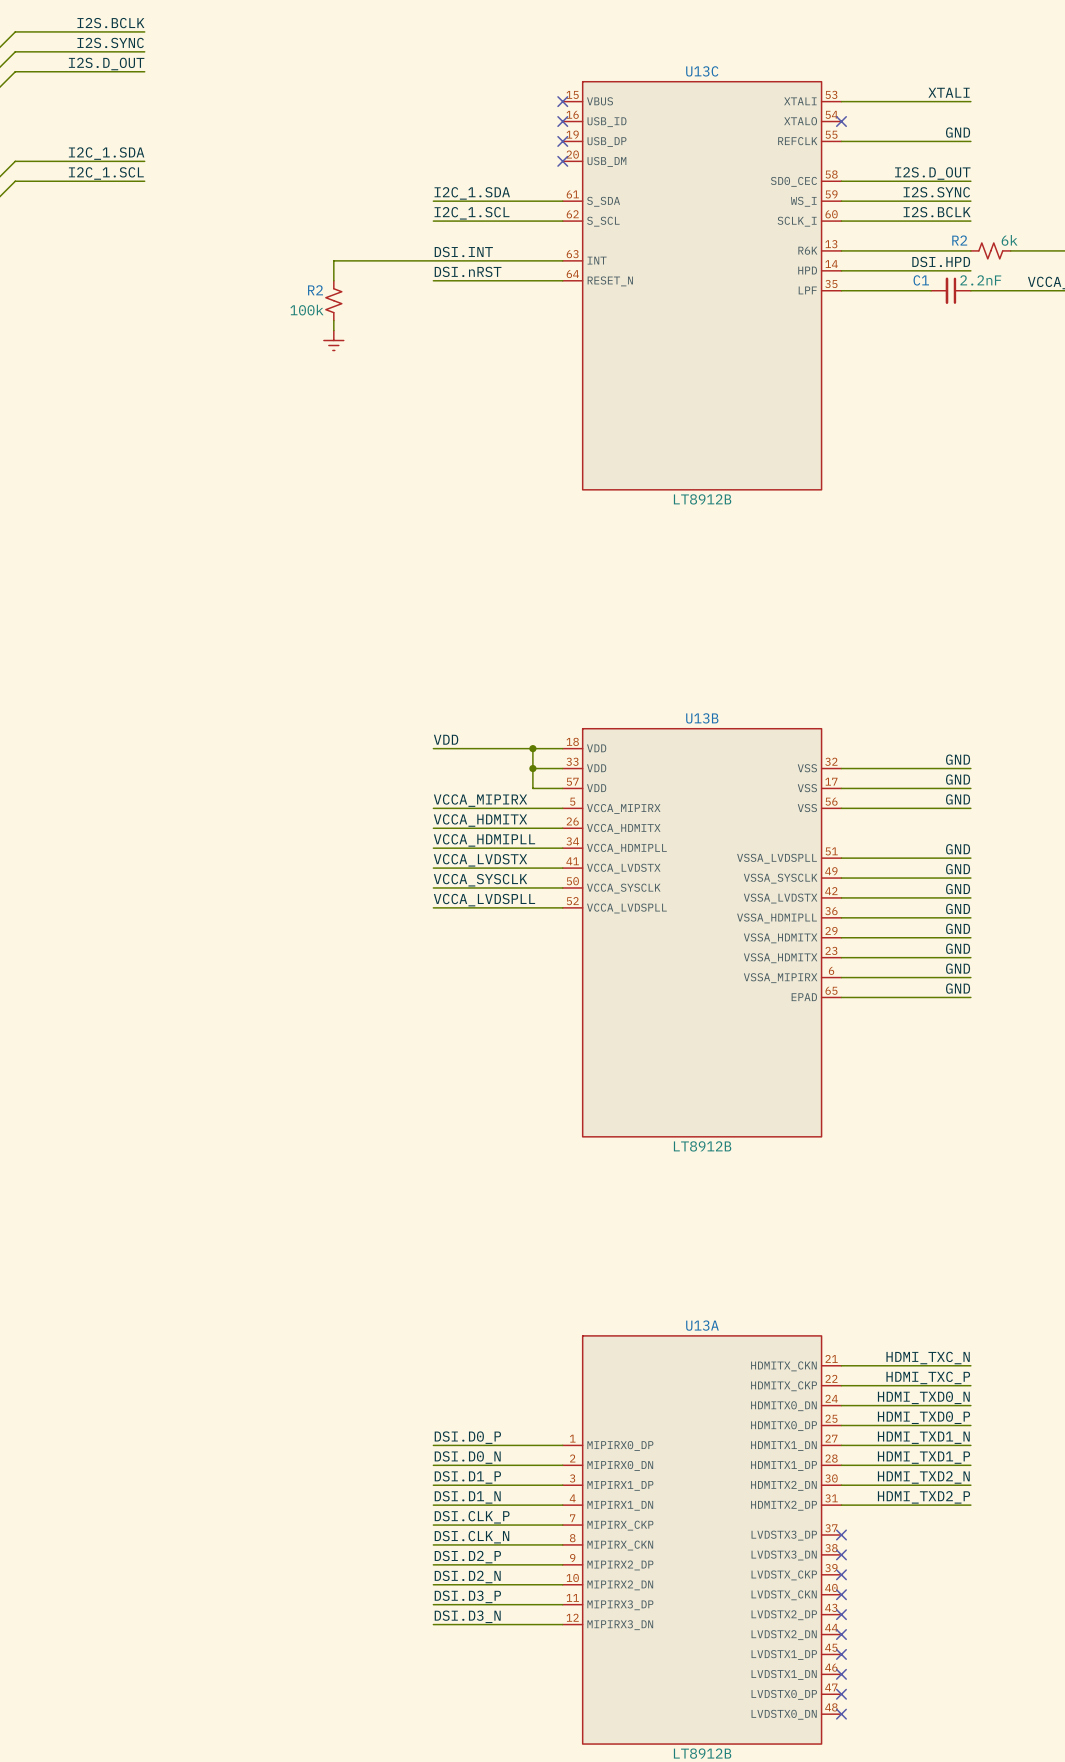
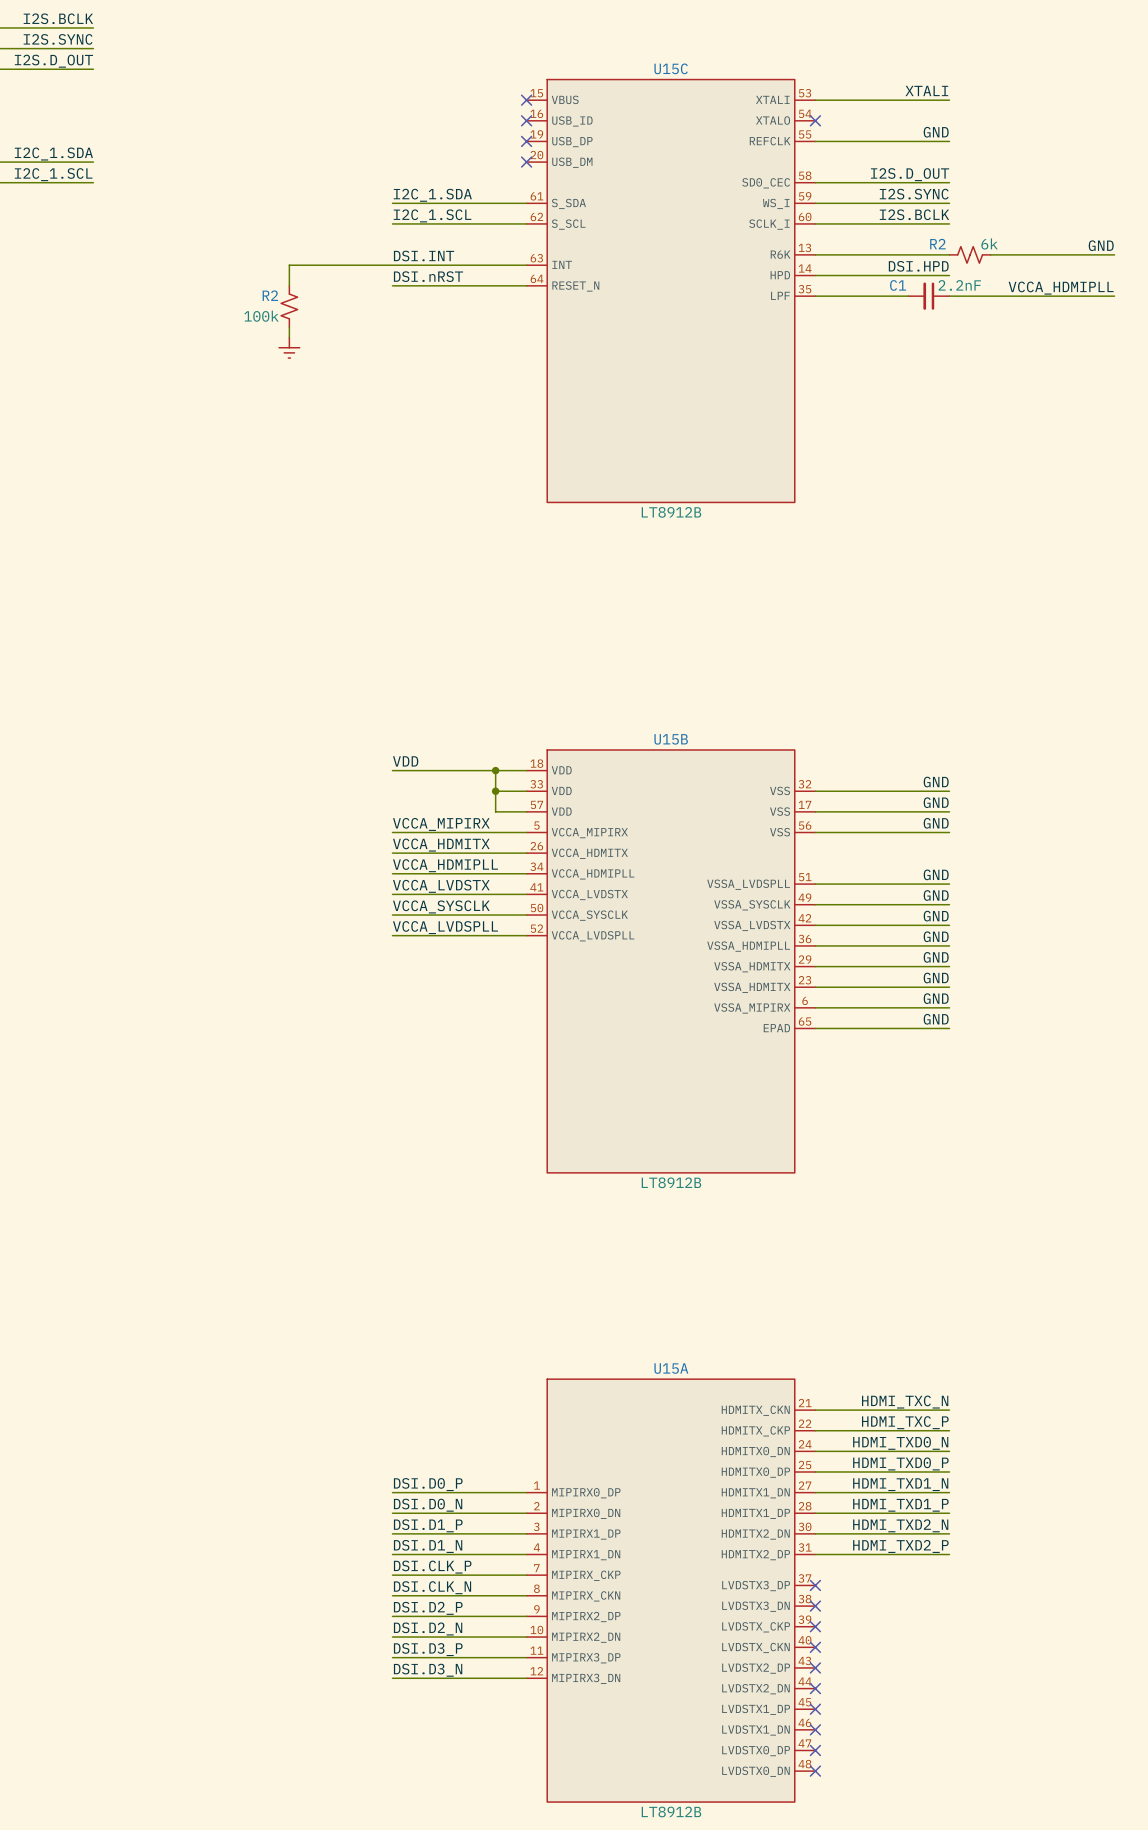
U13C name: U13C (702, 71) -> U15C (671, 68)
U13B name: U13B (702, 718) -> U15B (671, 739)
U13A name: U13A (702, 1325) -> U15A (671, 1368)

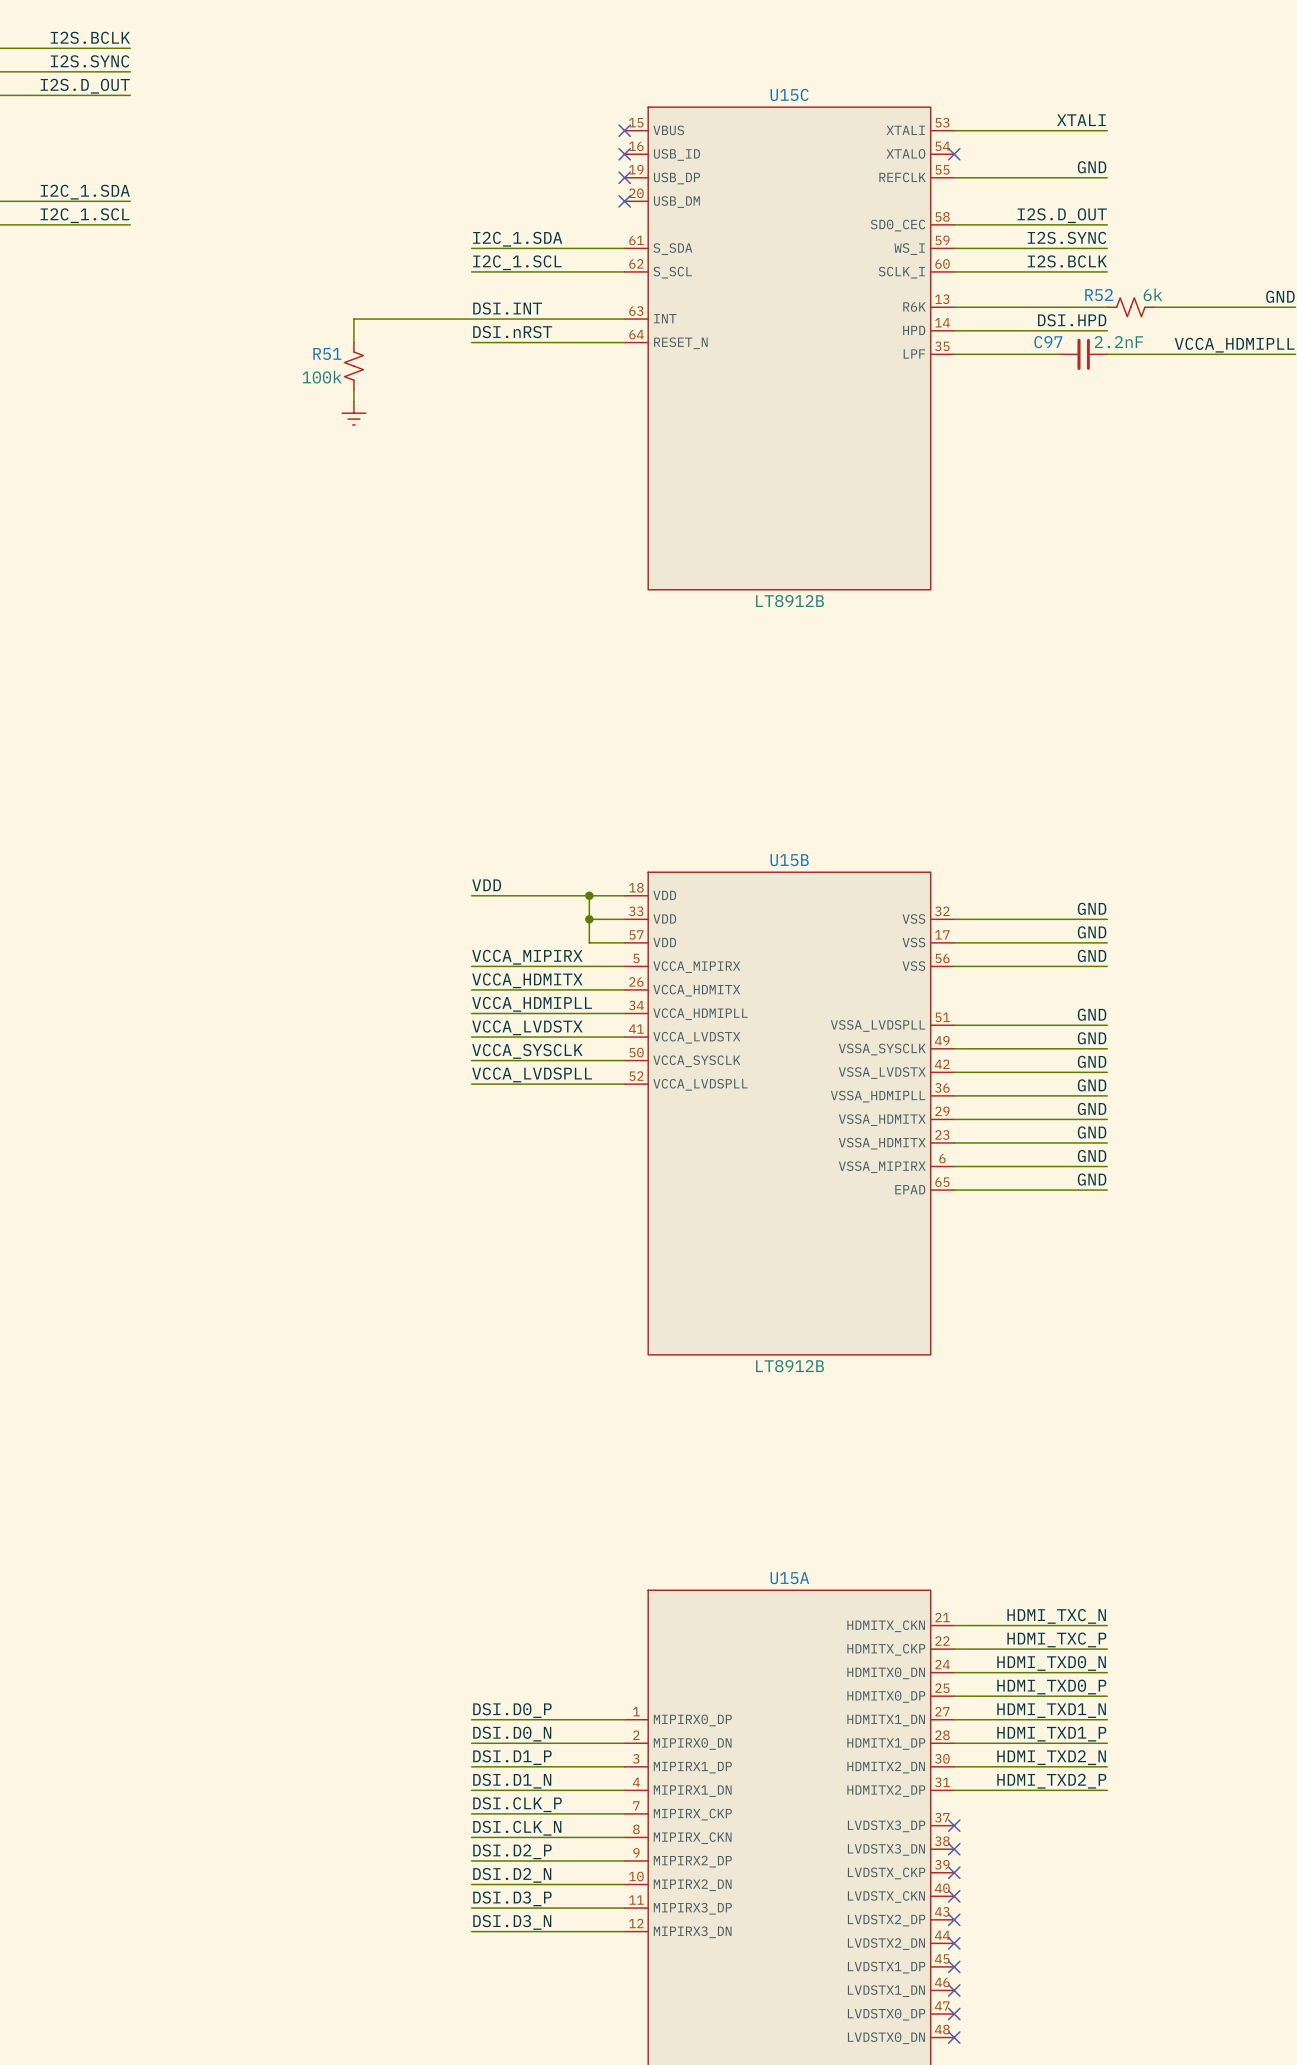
R2 name: R2 (937, 244) -> R52 (1099, 295)
C1 name: C1 (898, 285) -> C97 (1048, 342)
R2 name: R2 (270, 295) -> R51 (327, 354)

